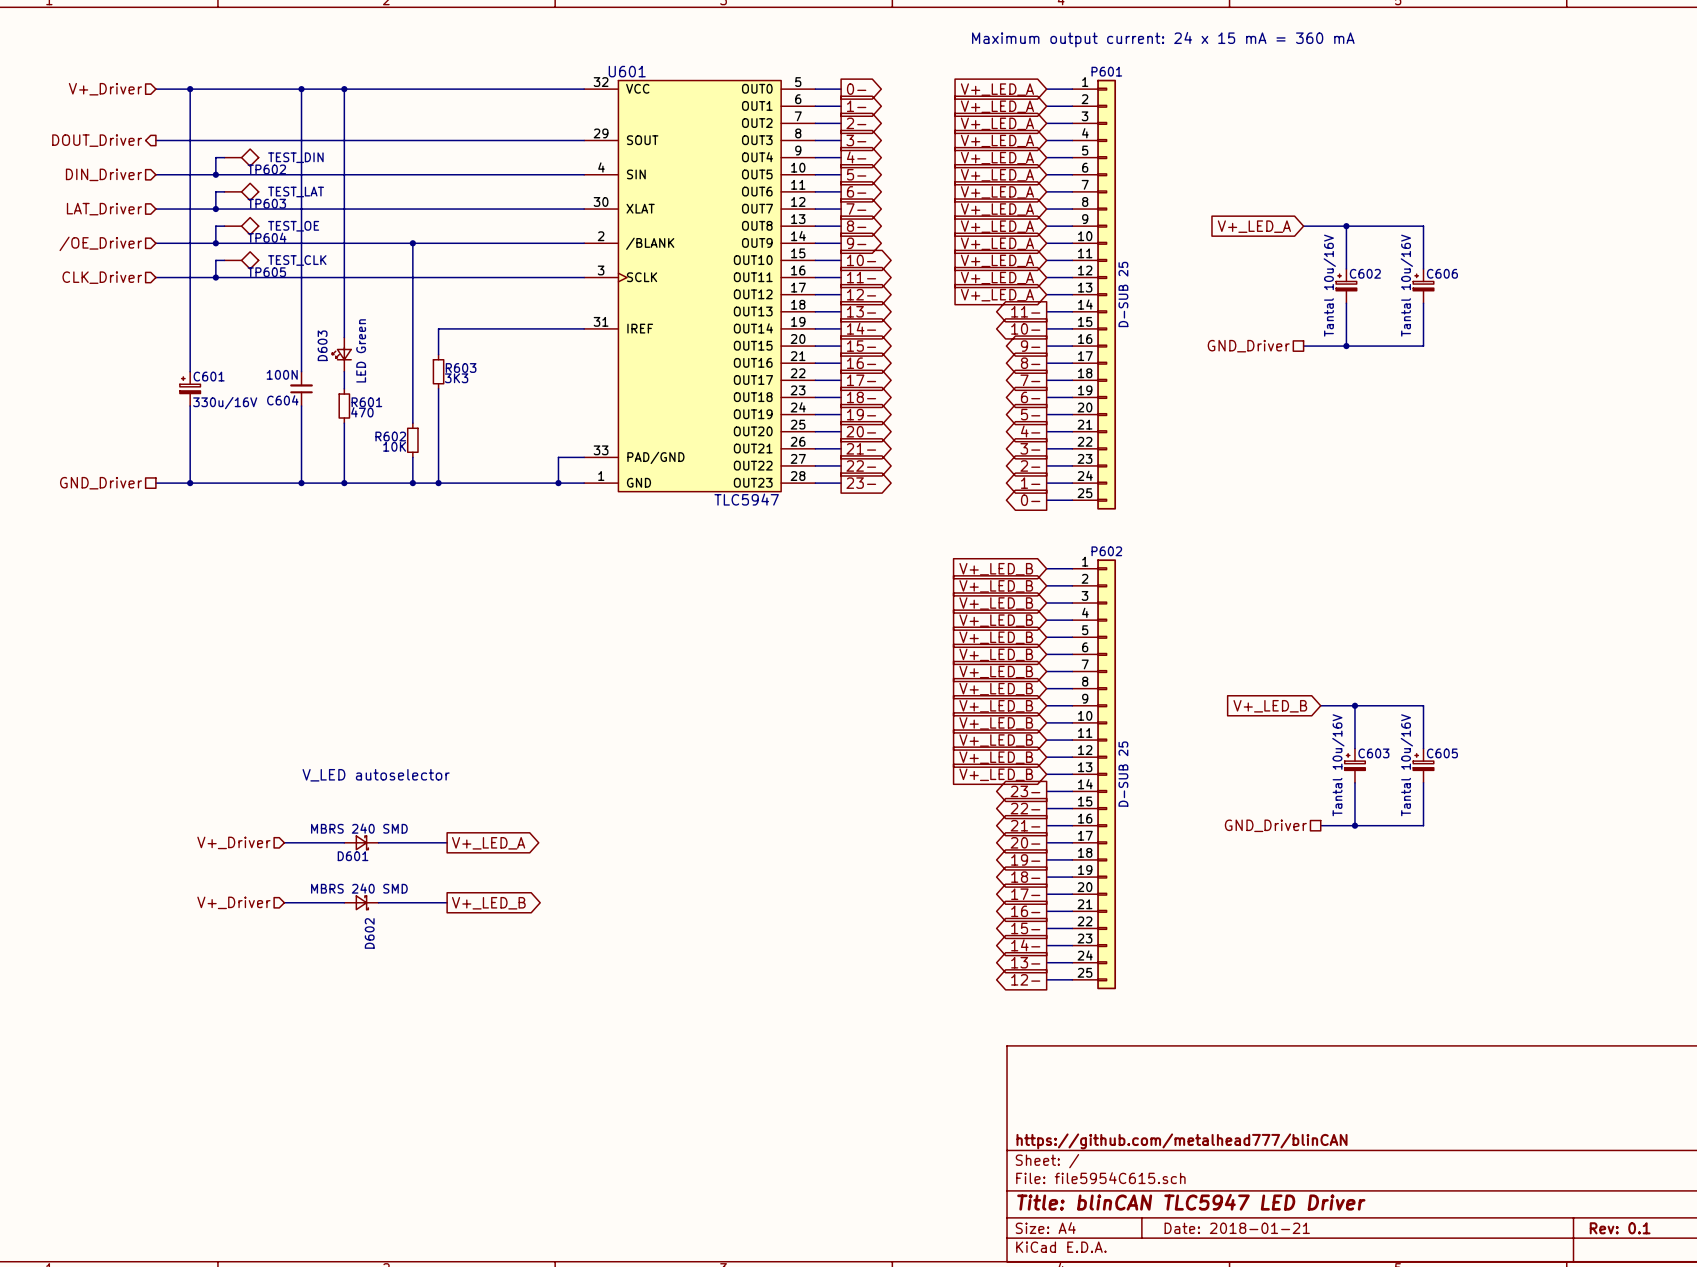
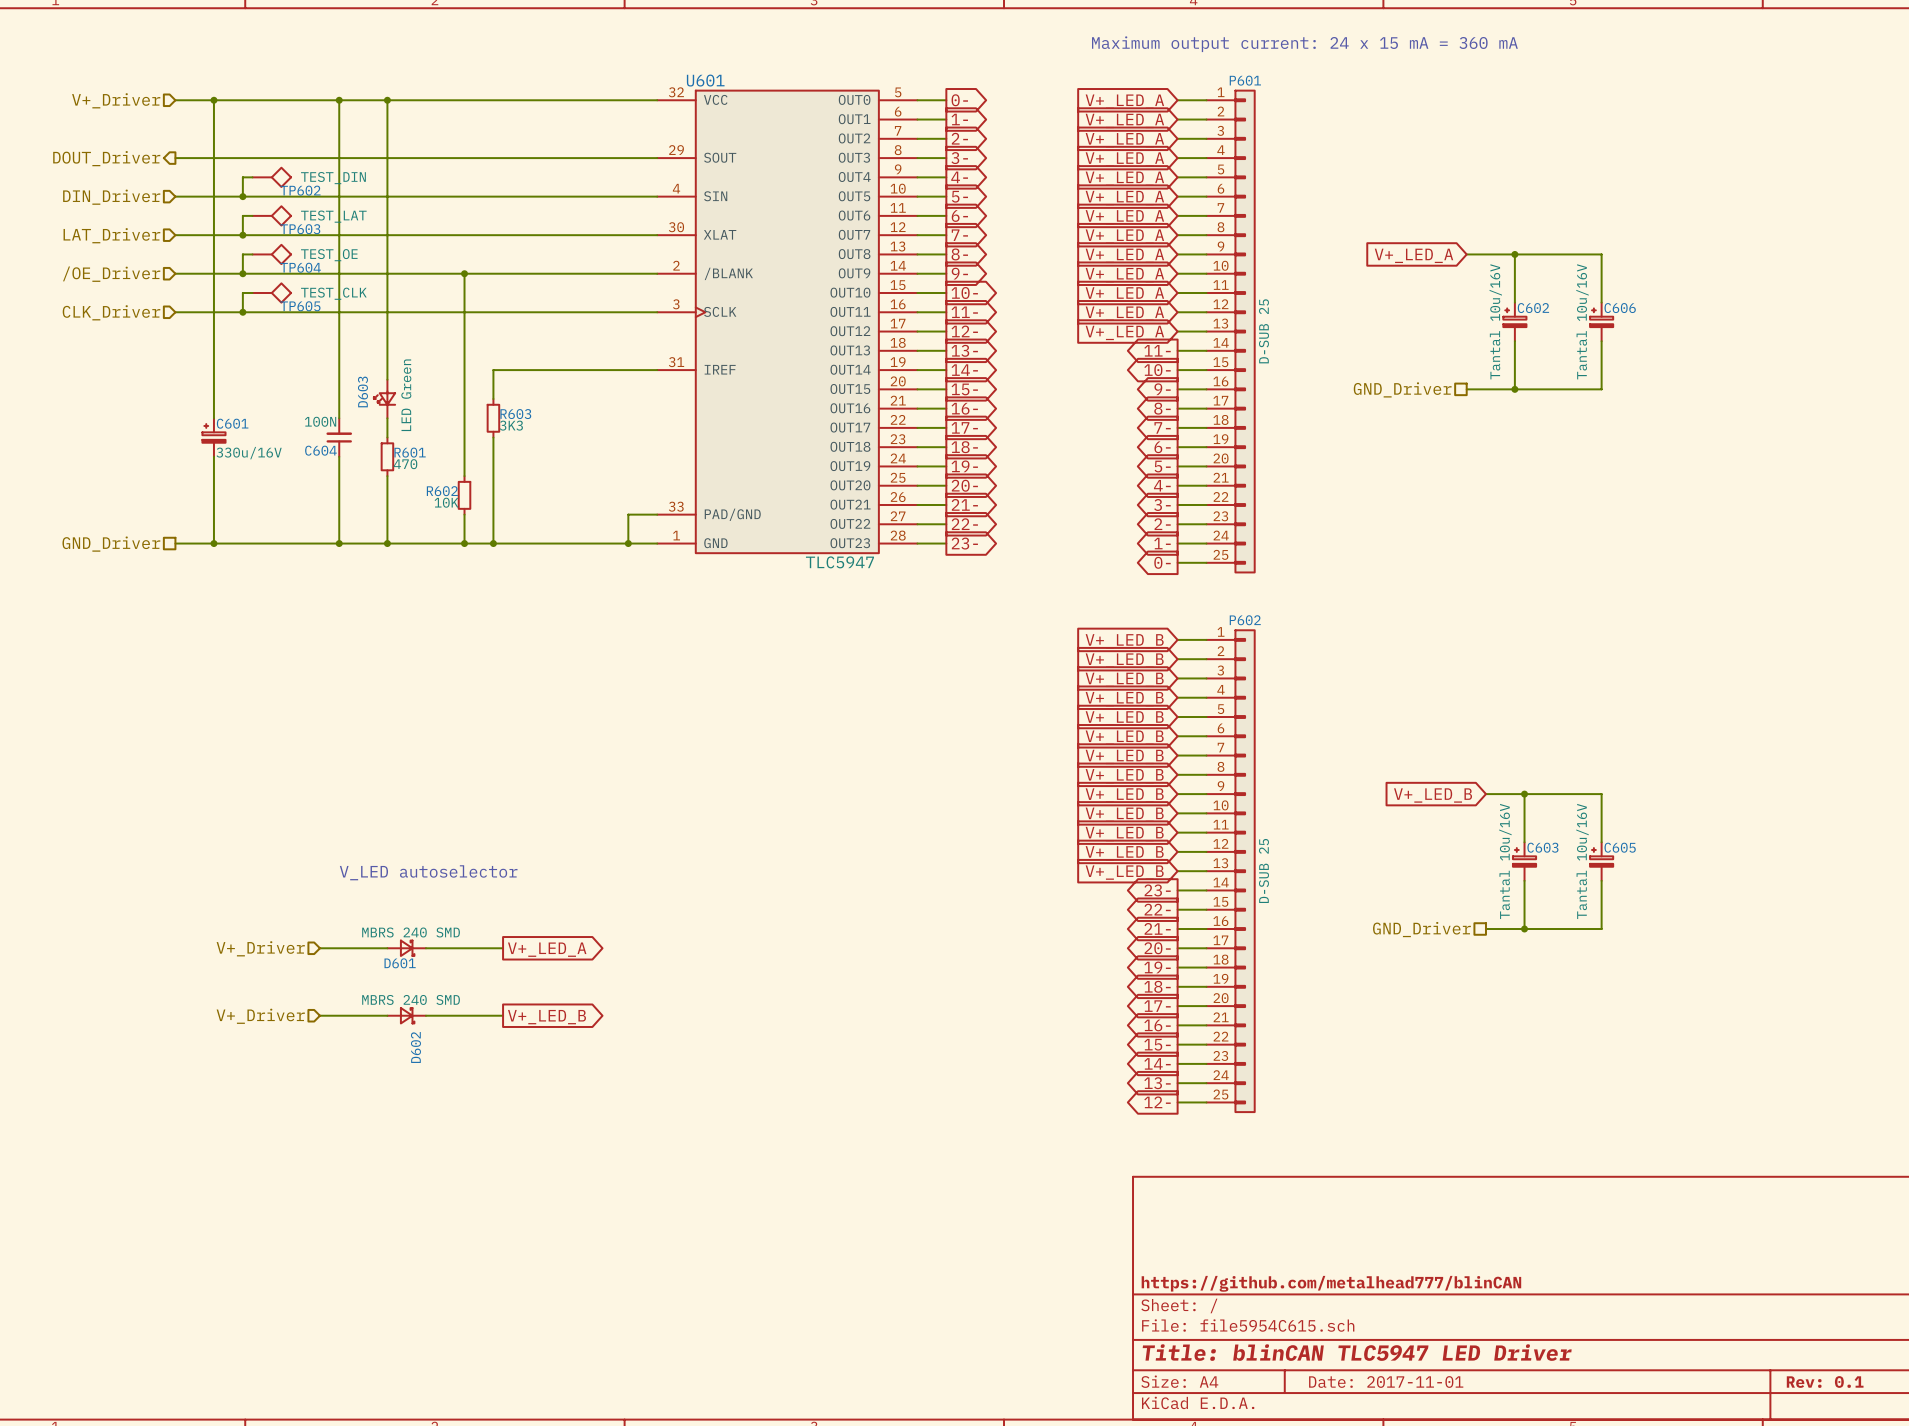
title block: Date: 2018-01-21 (1237, 1228) -> Date: 2017-11-01 (1386, 1382)

